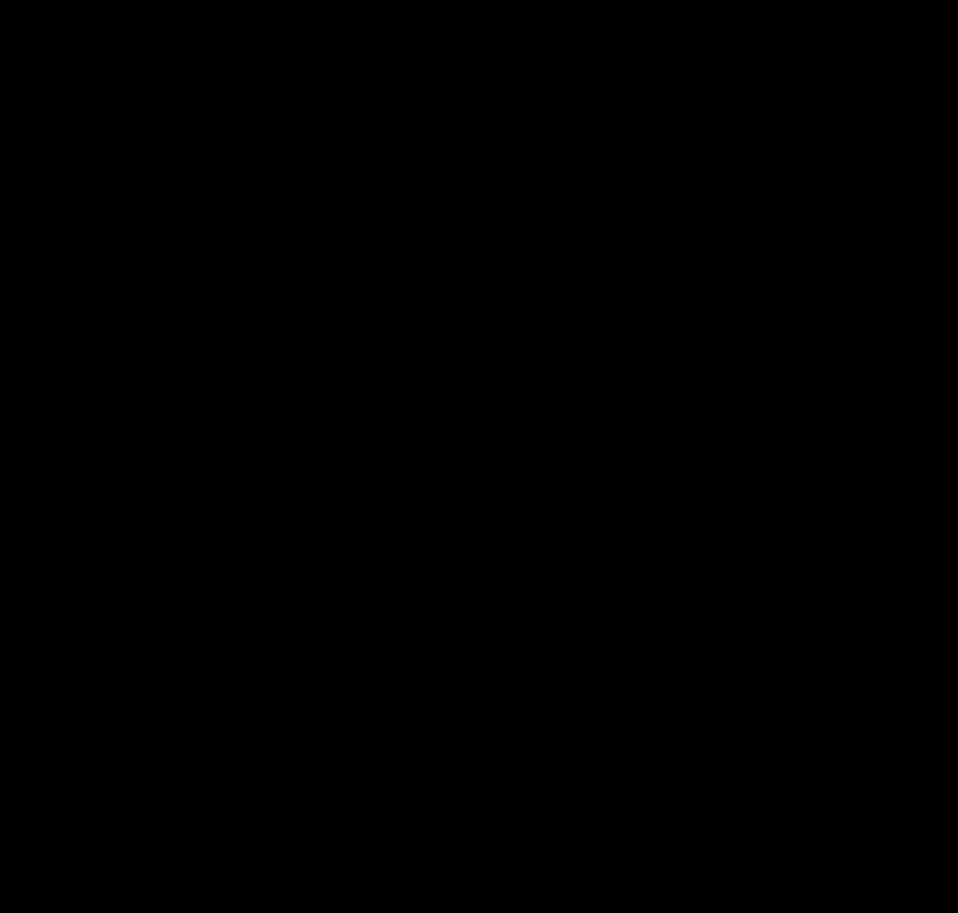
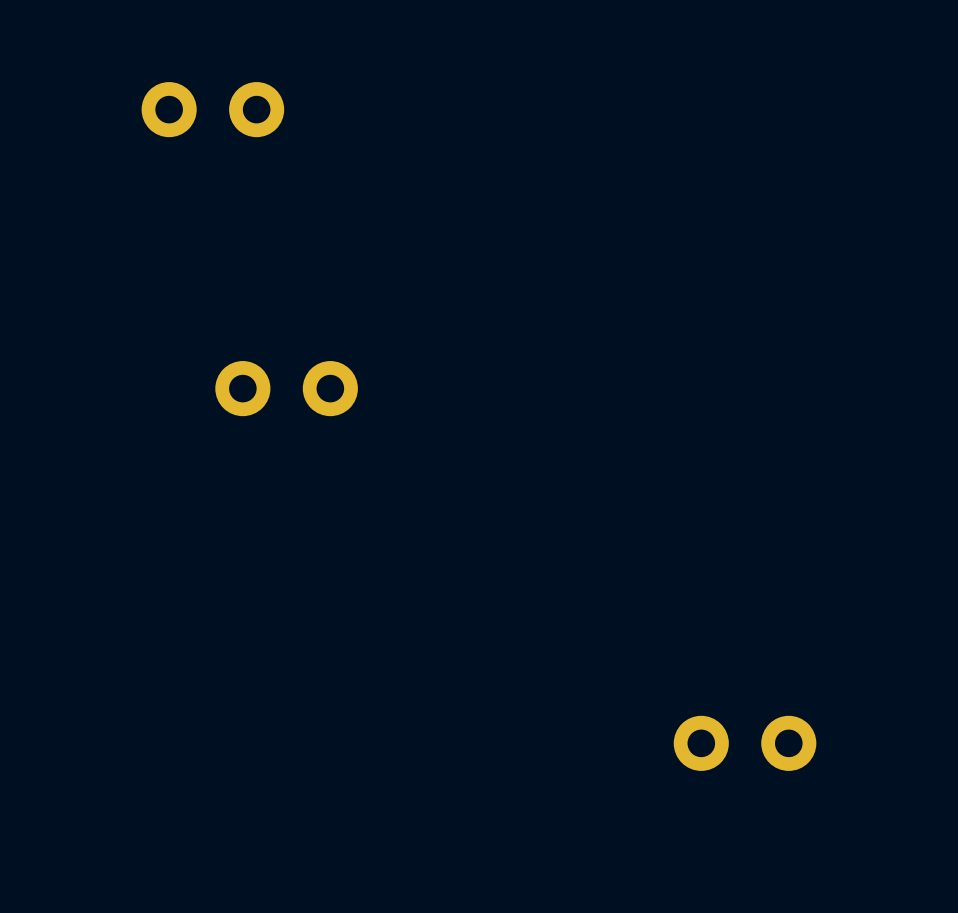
part: none -> (212, 109)
part: none -> (286, 388)
part: none -> (745, 743)

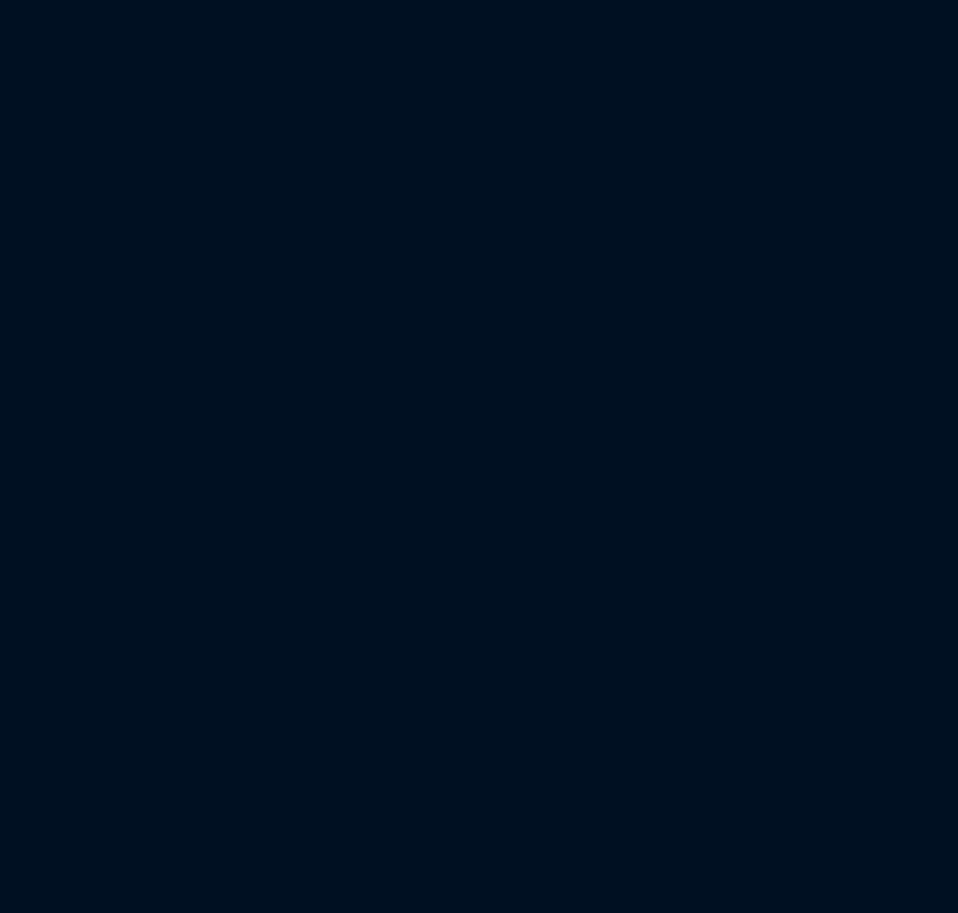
part: (212, 109) -> none
part: (286, 388) -> none
part: (745, 743) -> none

